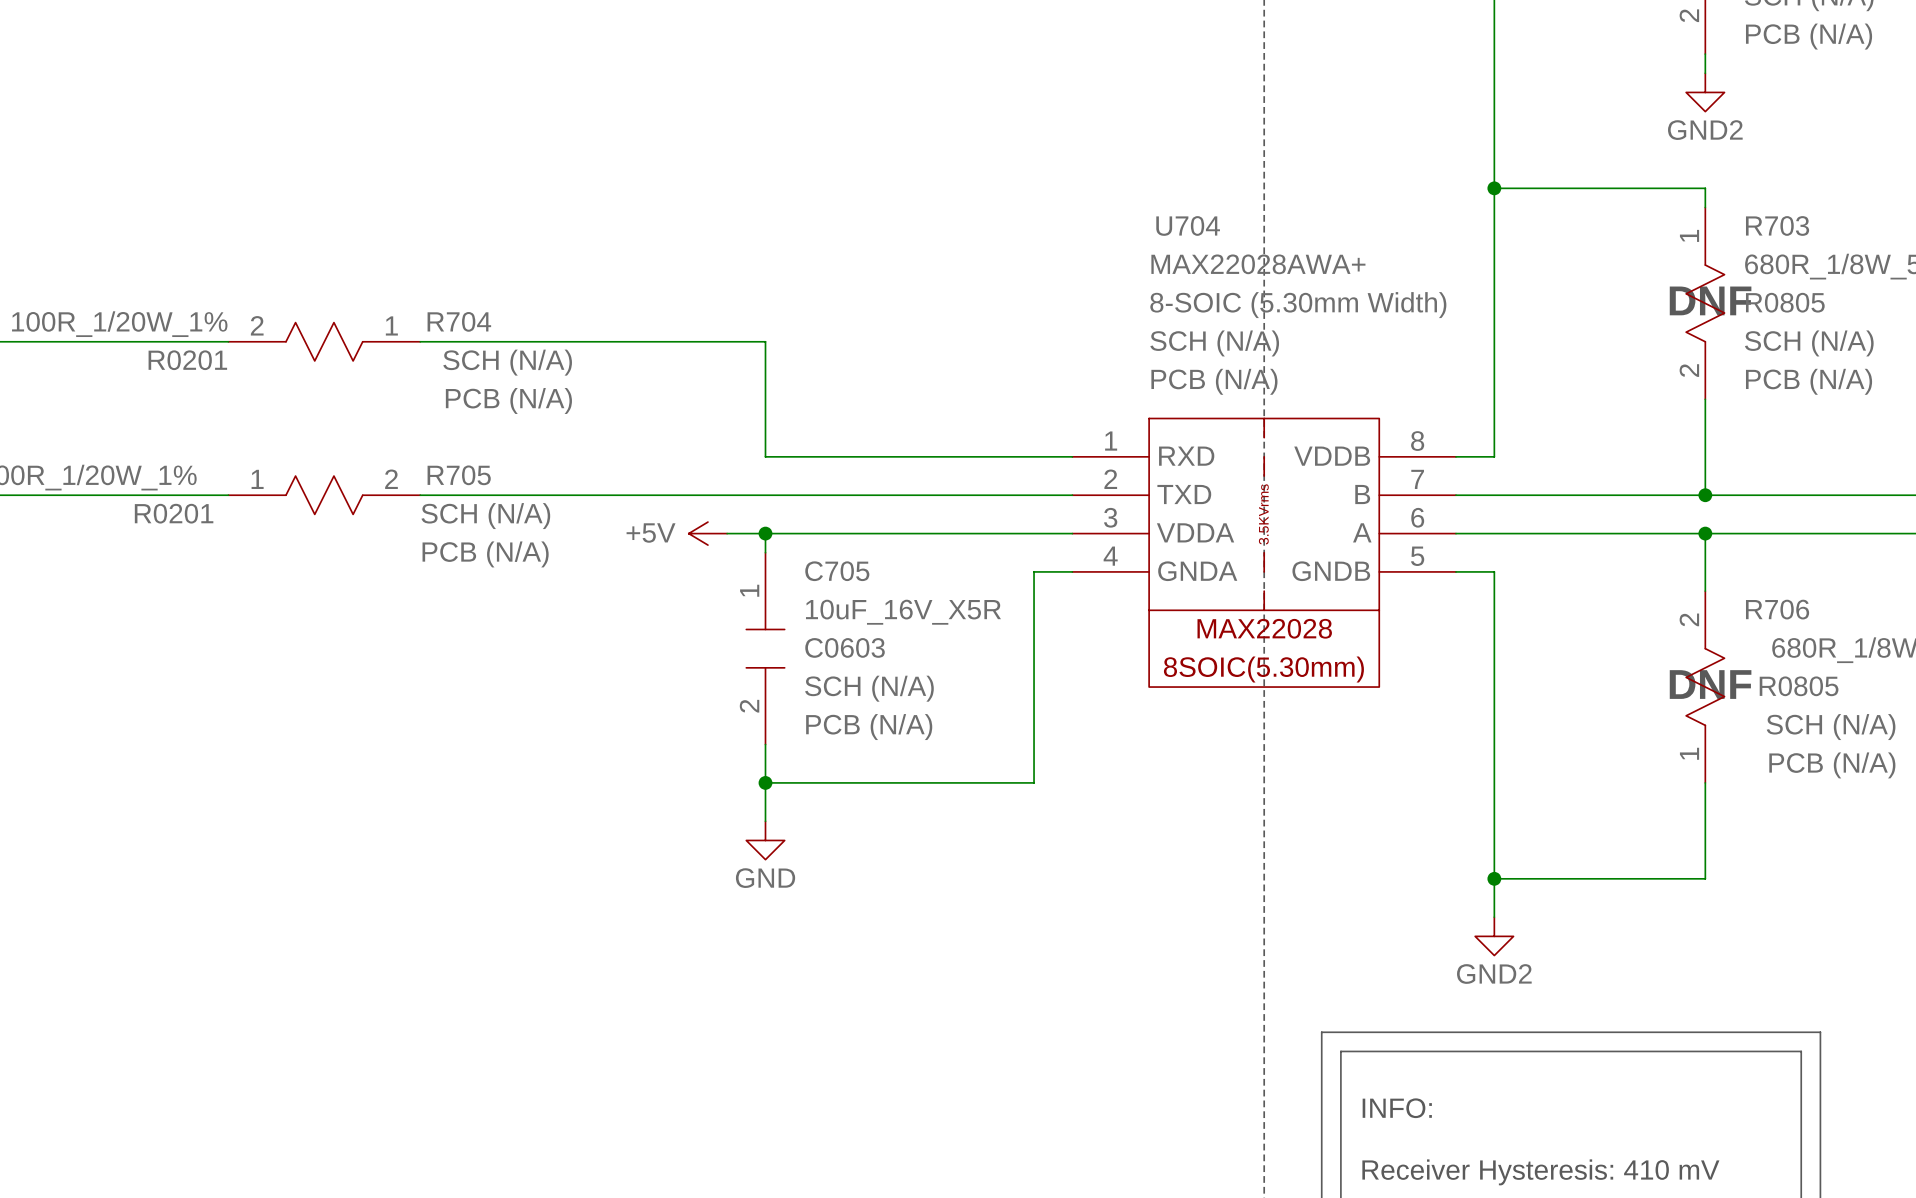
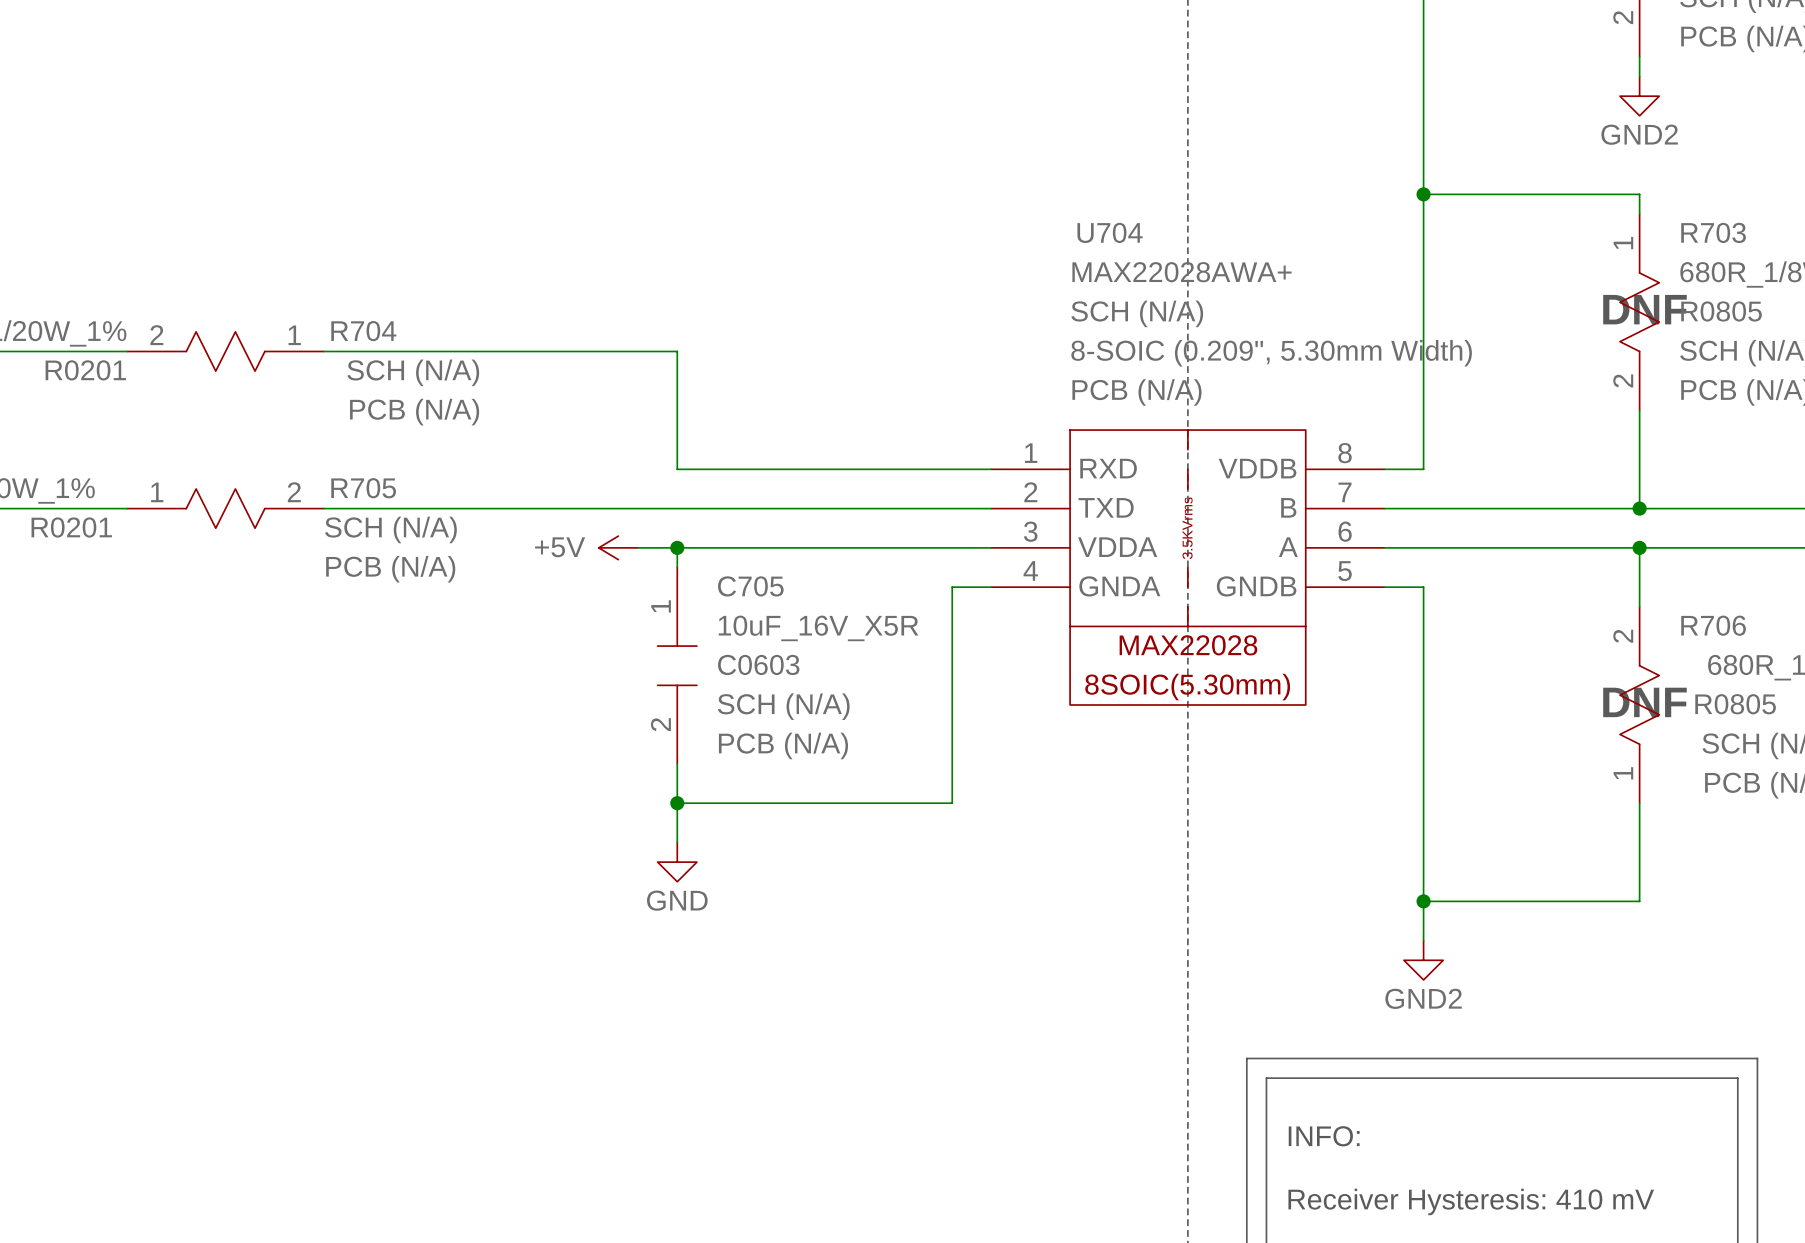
U704 text: 8-SOIC (5.30mm Width) (1298, 305) -> 8-SOIC (0.209", 5.30mm Width) (1271, 353)
U704 text position: SCH (N/A) (1214, 343) -> SCH (N/A) (1137, 313)

